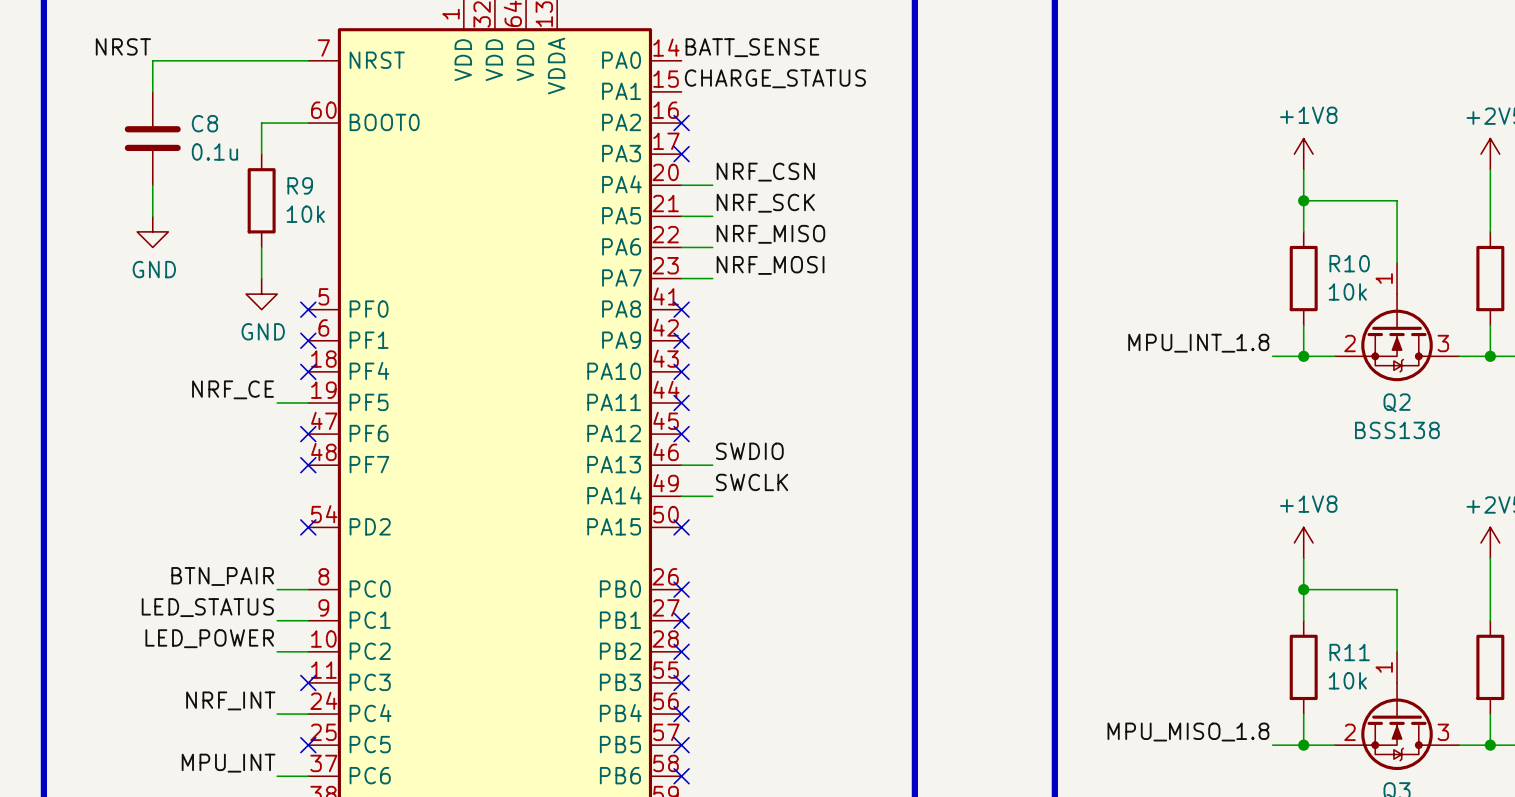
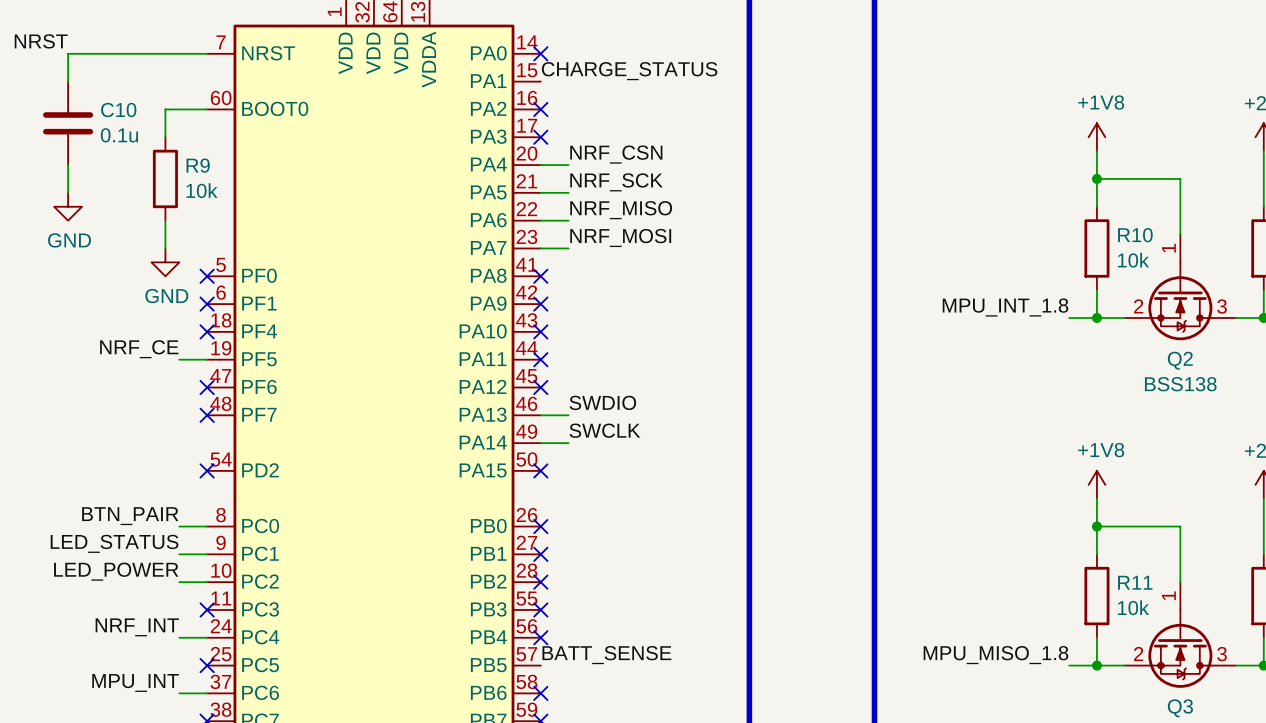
label: BATT_SENSE (752, 47) -> none
no-connect mark: none -> (540, 53)
C8 name: C8 (204, 123) -> C10 (118, 110)
label: none -> BATT_SENSE (606, 655)
no-connect mark: (681, 745) -> none

